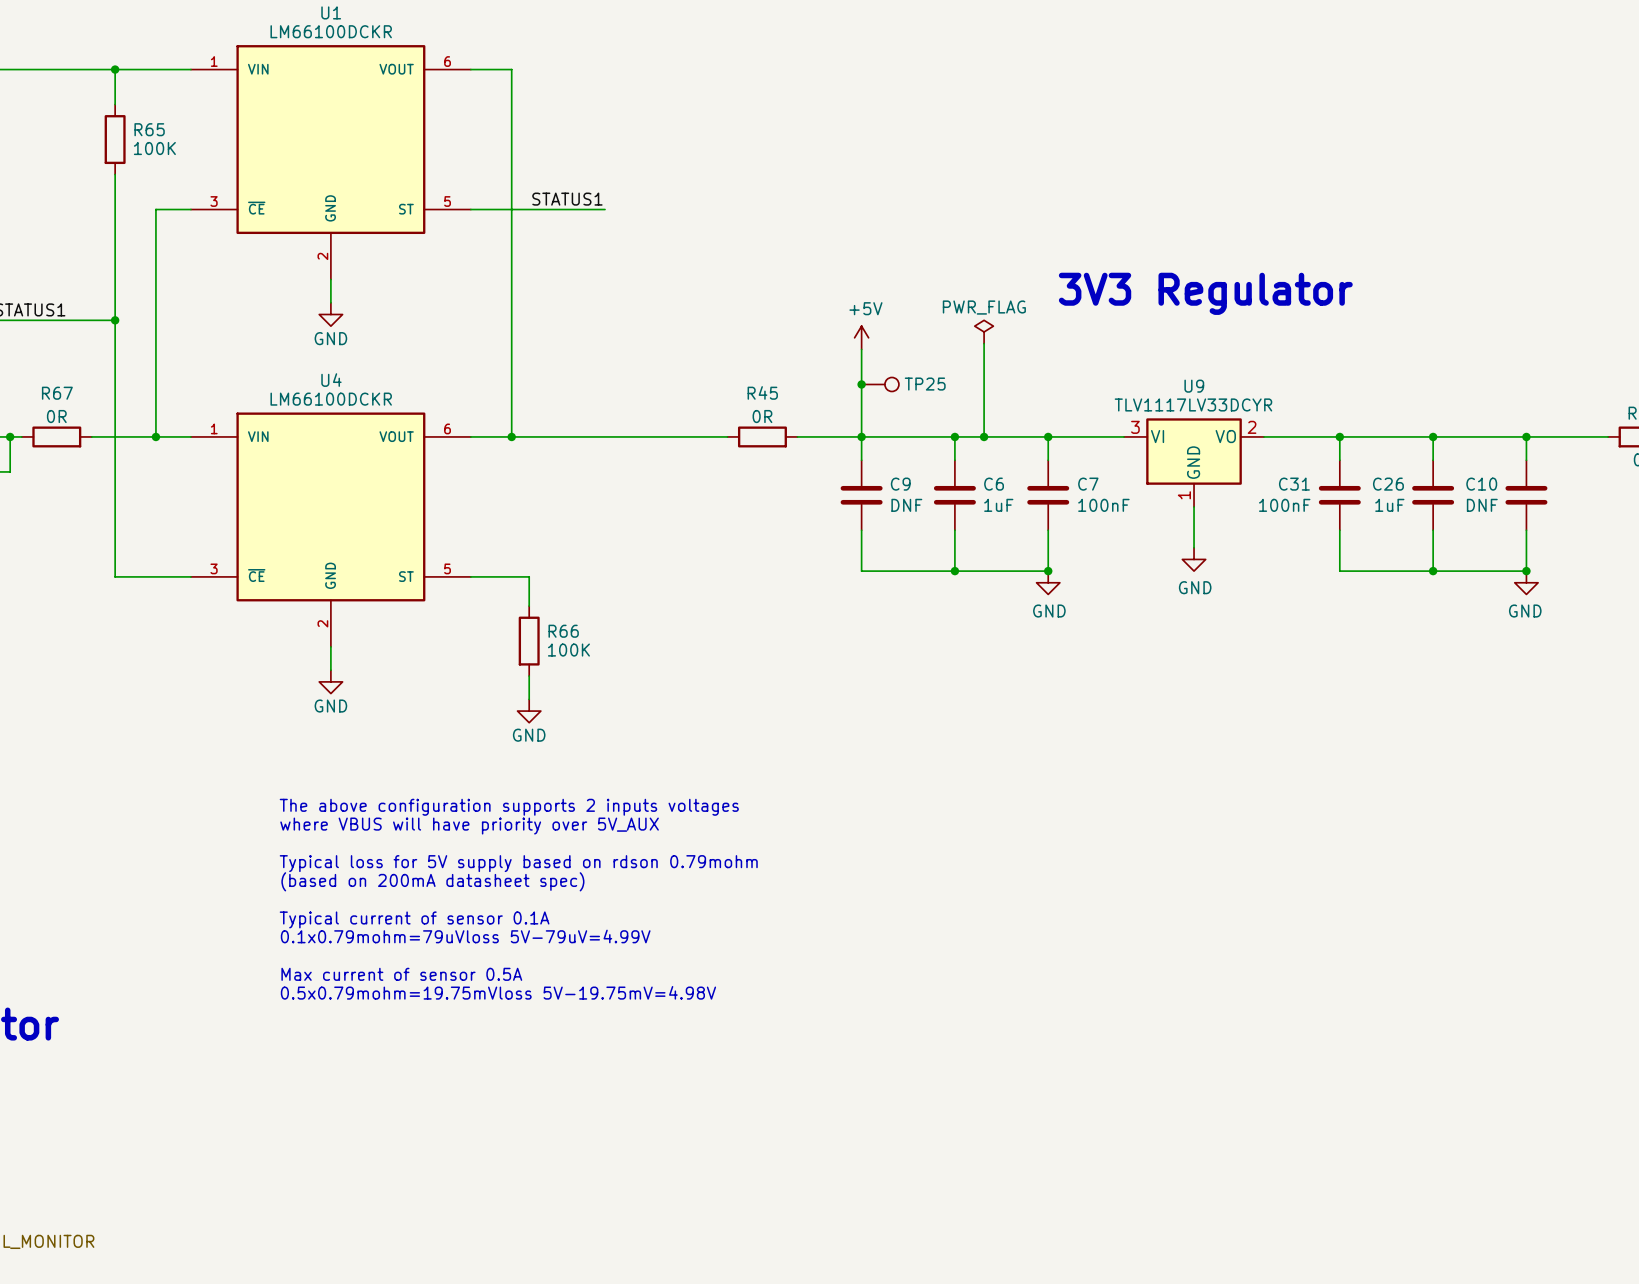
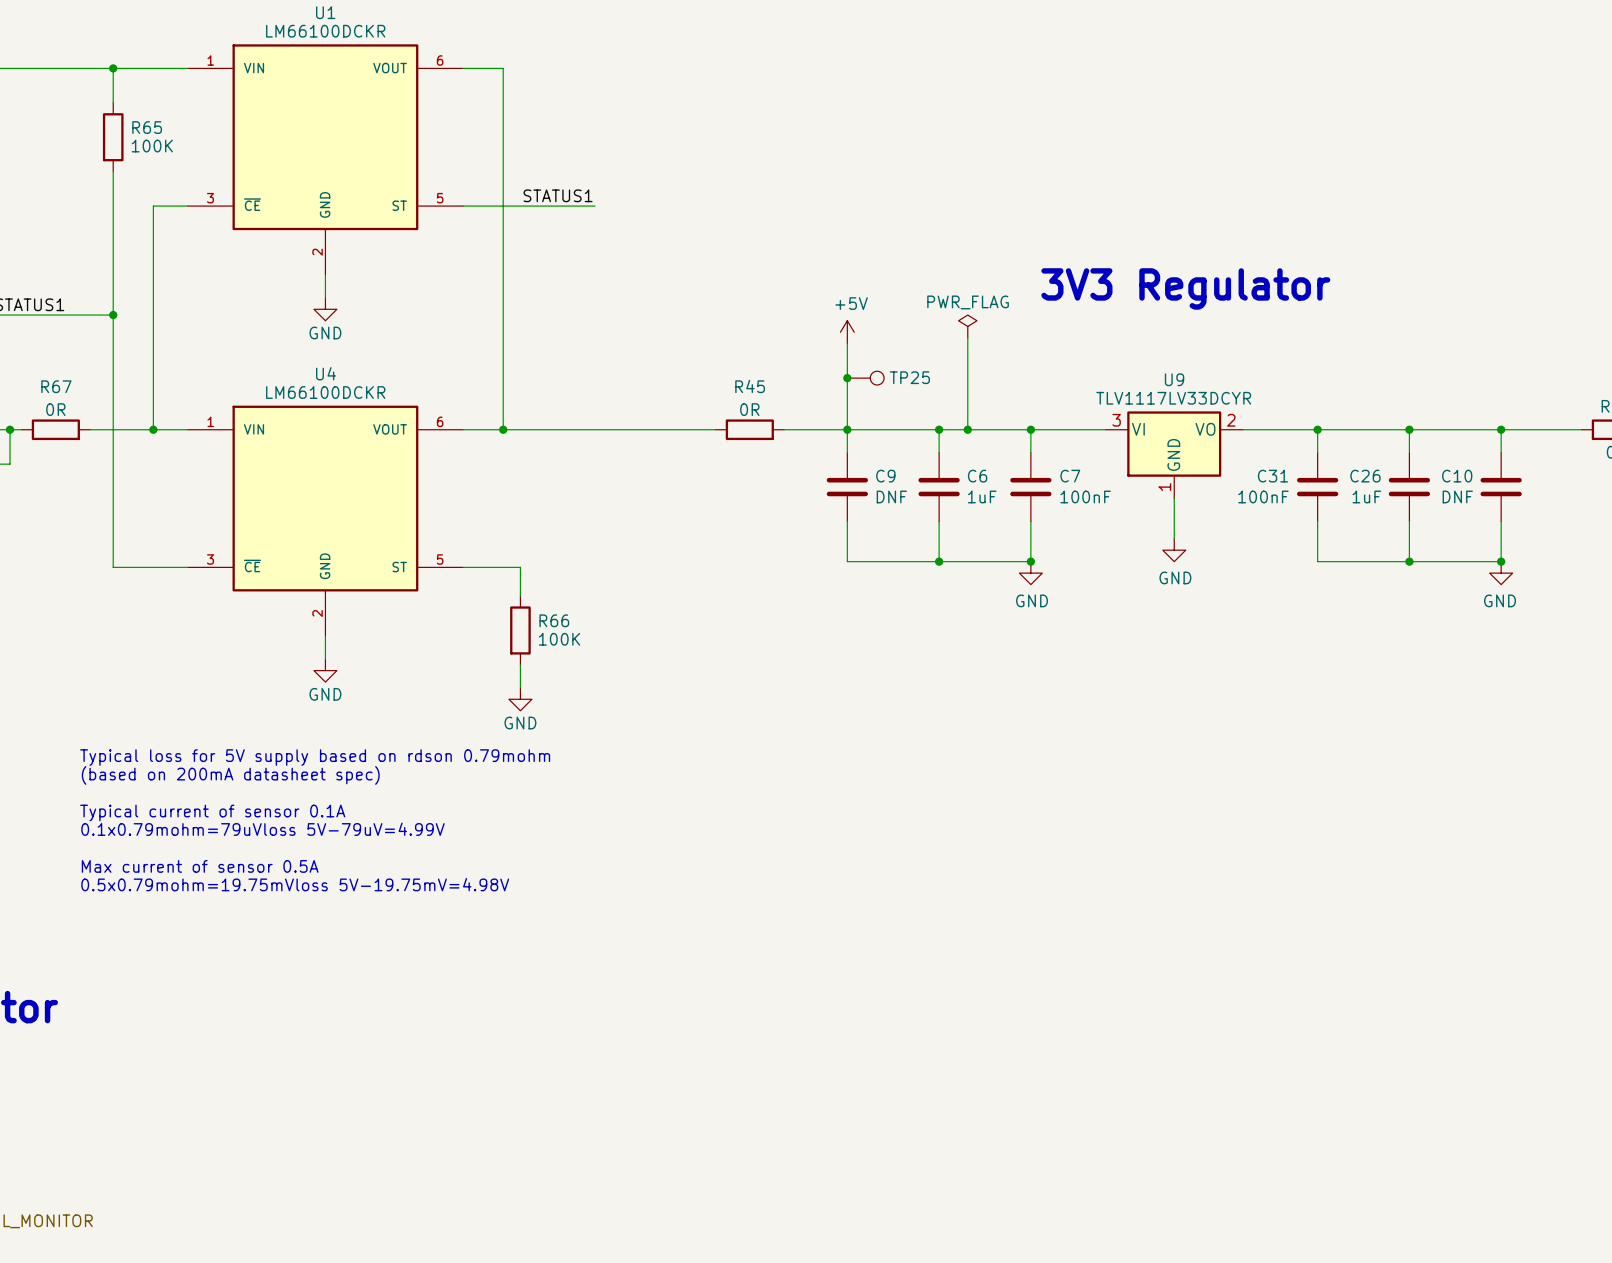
text: The above configuration supports 2 inputs voltages (509, 807) -> none
text: where VBUS will have priority over 5V_AUX (469, 826) -> none
text position: Typical loss for 5V supply based on rdson 0.79mohm (518, 863) -> Typical loss for 5V supply based on rdson 0.79mohm (315, 757)
text position: (based on 200mA datasheet spec) (432, 881) -> (based on 200mA datasheet spec) (230, 775)
text position: Typical current of sensor 0.1A (414, 919) -> Typical current of sensor 0.1A (212, 812)
text position: 0.1x0.79mohm=79uVloss 5V-79uV=4.99V (465, 936) -> 0.1x0.79mohm=79uVloss 5V-79uV=4.99V (262, 829)
text position: Max current of sensor 0.5A (401, 974) -> Max current of sensor 0.5A (200, 866)
text position: 0.5x0.79mohm=19.75mVloss 5V-19.75mV=4.98V (498, 992) -> 0.5x0.79mohm=19.75mVloss 5V-19.75mV=4.98V (295, 884)

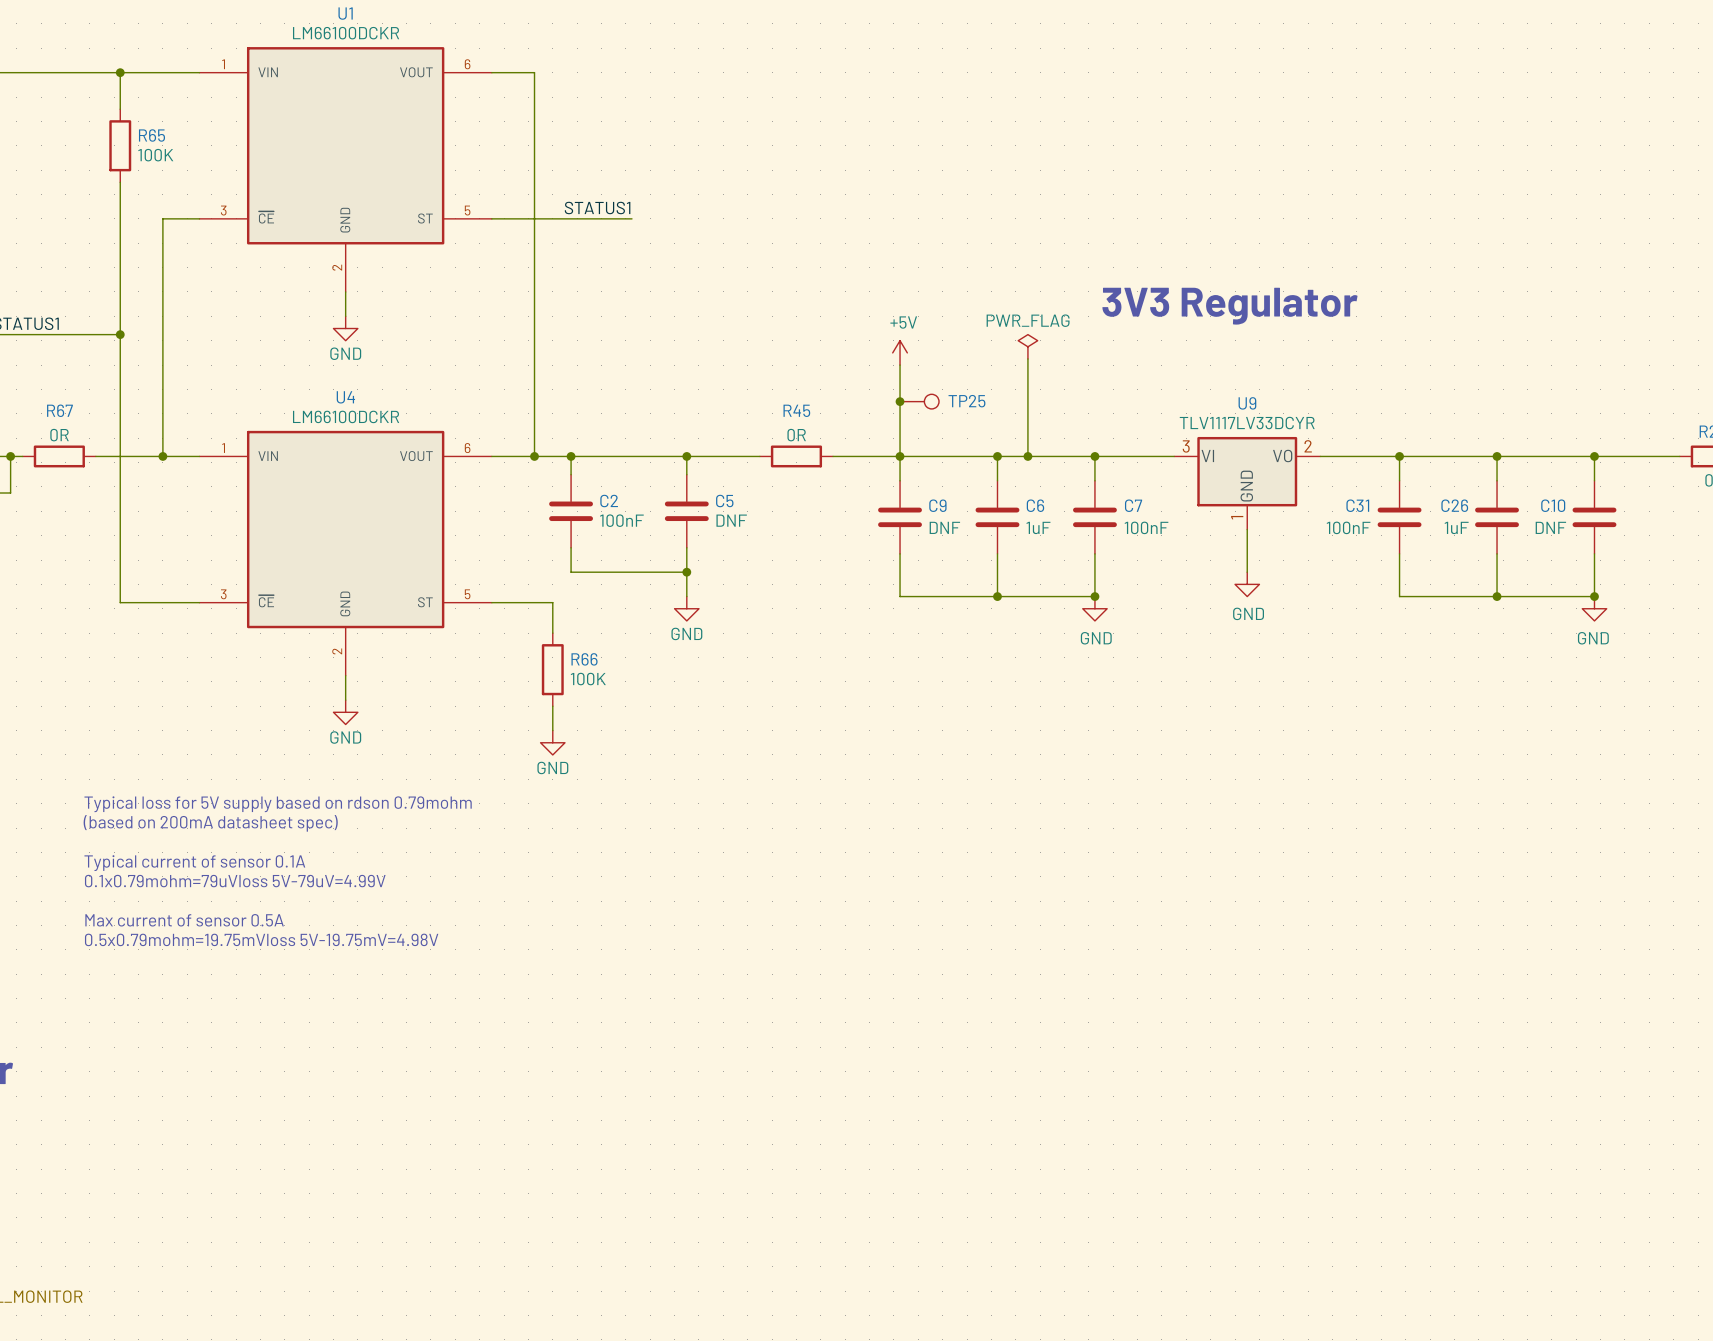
wire: none -> (571, 456) (571, 474)
junction: none -> (571, 456)
wire: none -> (686, 456) (686, 474)
junction: none -> (686, 456)
C2: none -> 100nF (571, 511)
C5: none -> DNF (686, 511)
wire: none -> (571, 547) (571, 572) (686, 572)
wire: none -> (686, 547) (686, 596)
junction: none -> (686, 572)
power symbol: none -> GND (686, 608)

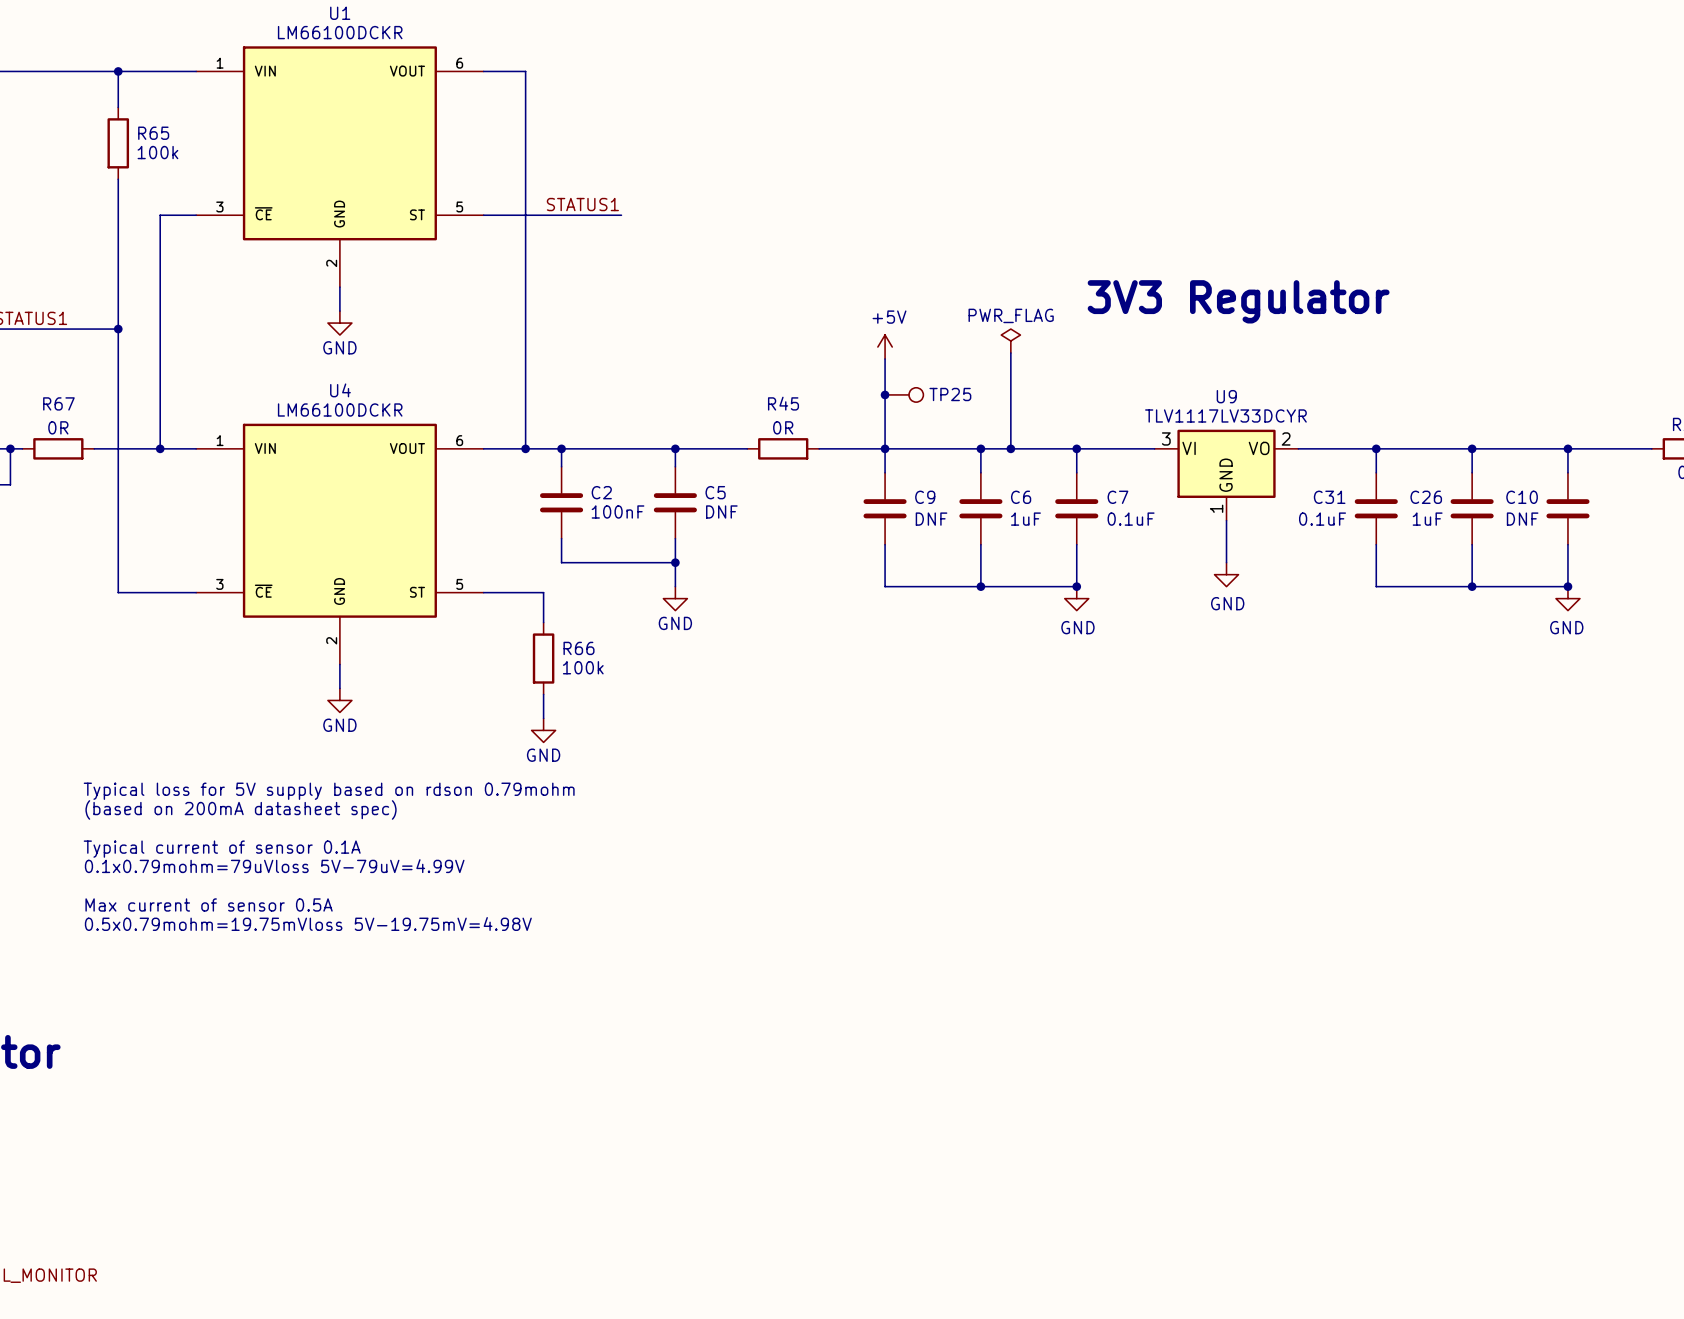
R65 value: 100K (155, 155) -> 100k (157, 152)
C7 value: 100nF (1146, 527) -> 0.1uF (1131, 519)
C31 value: 100nF (1348, 527) -> 0.1uF (1322, 519)
R66 value: 100K (588, 679) -> 100k (583, 667)

